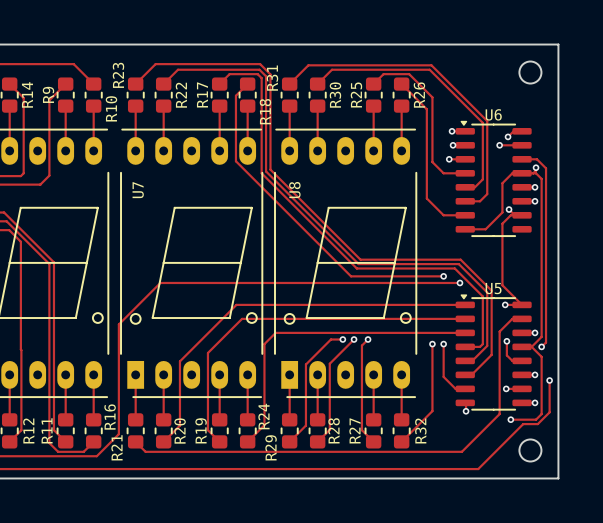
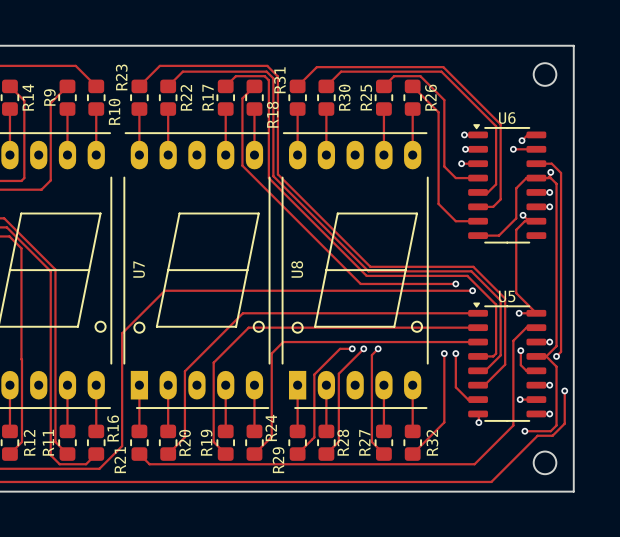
U7 name position: U7 (138, 190) -> U7 (139, 269)
U8 name position: U8 (294, 190) -> U8 (297, 269)

